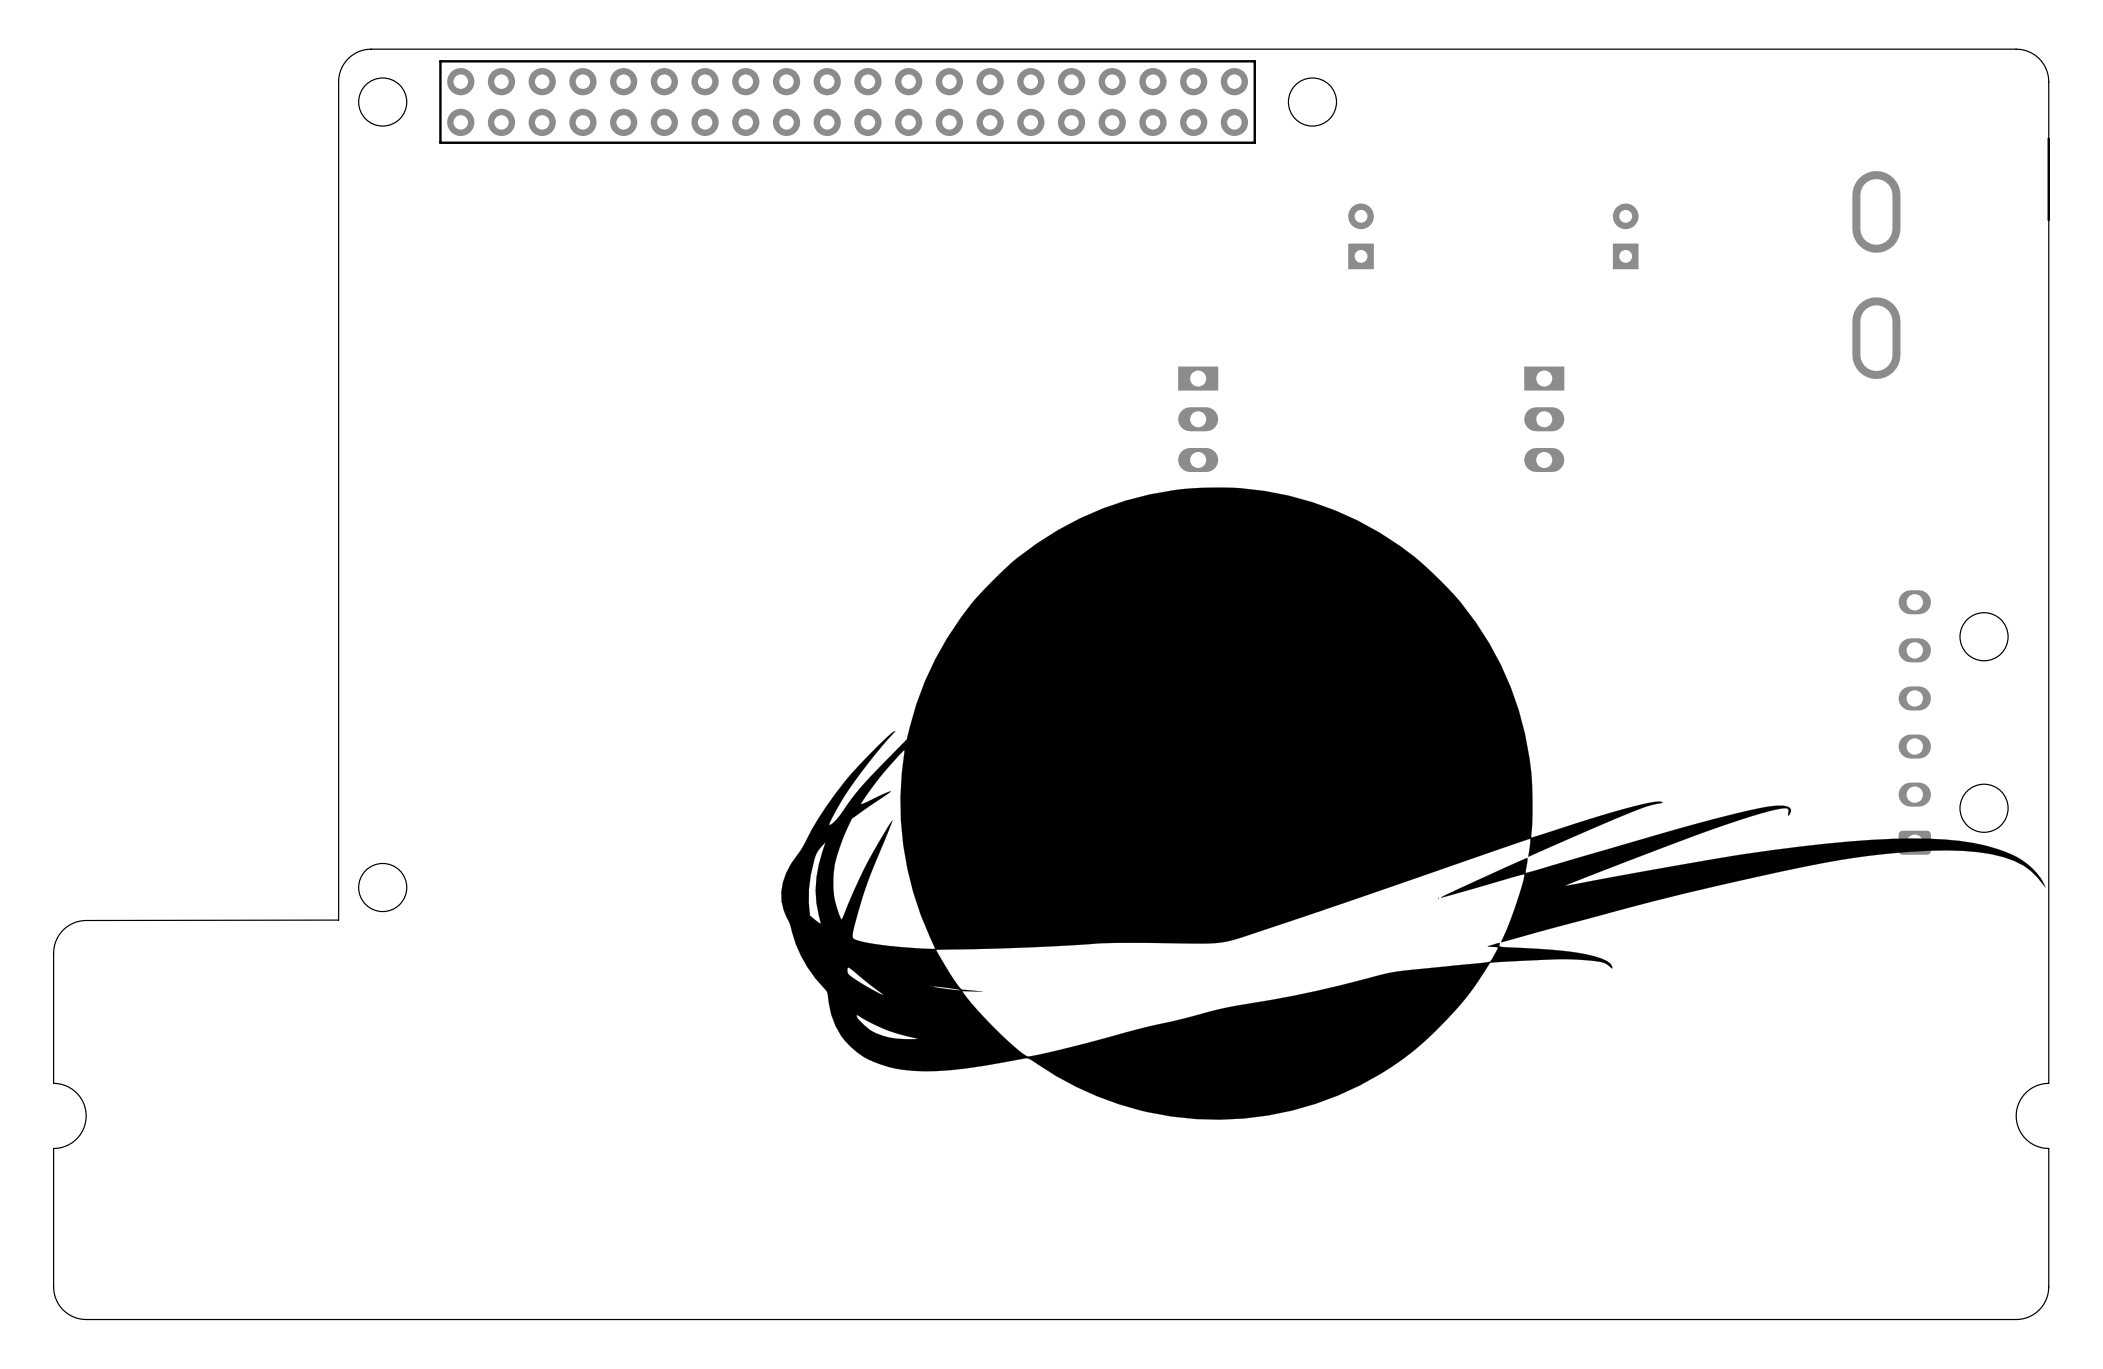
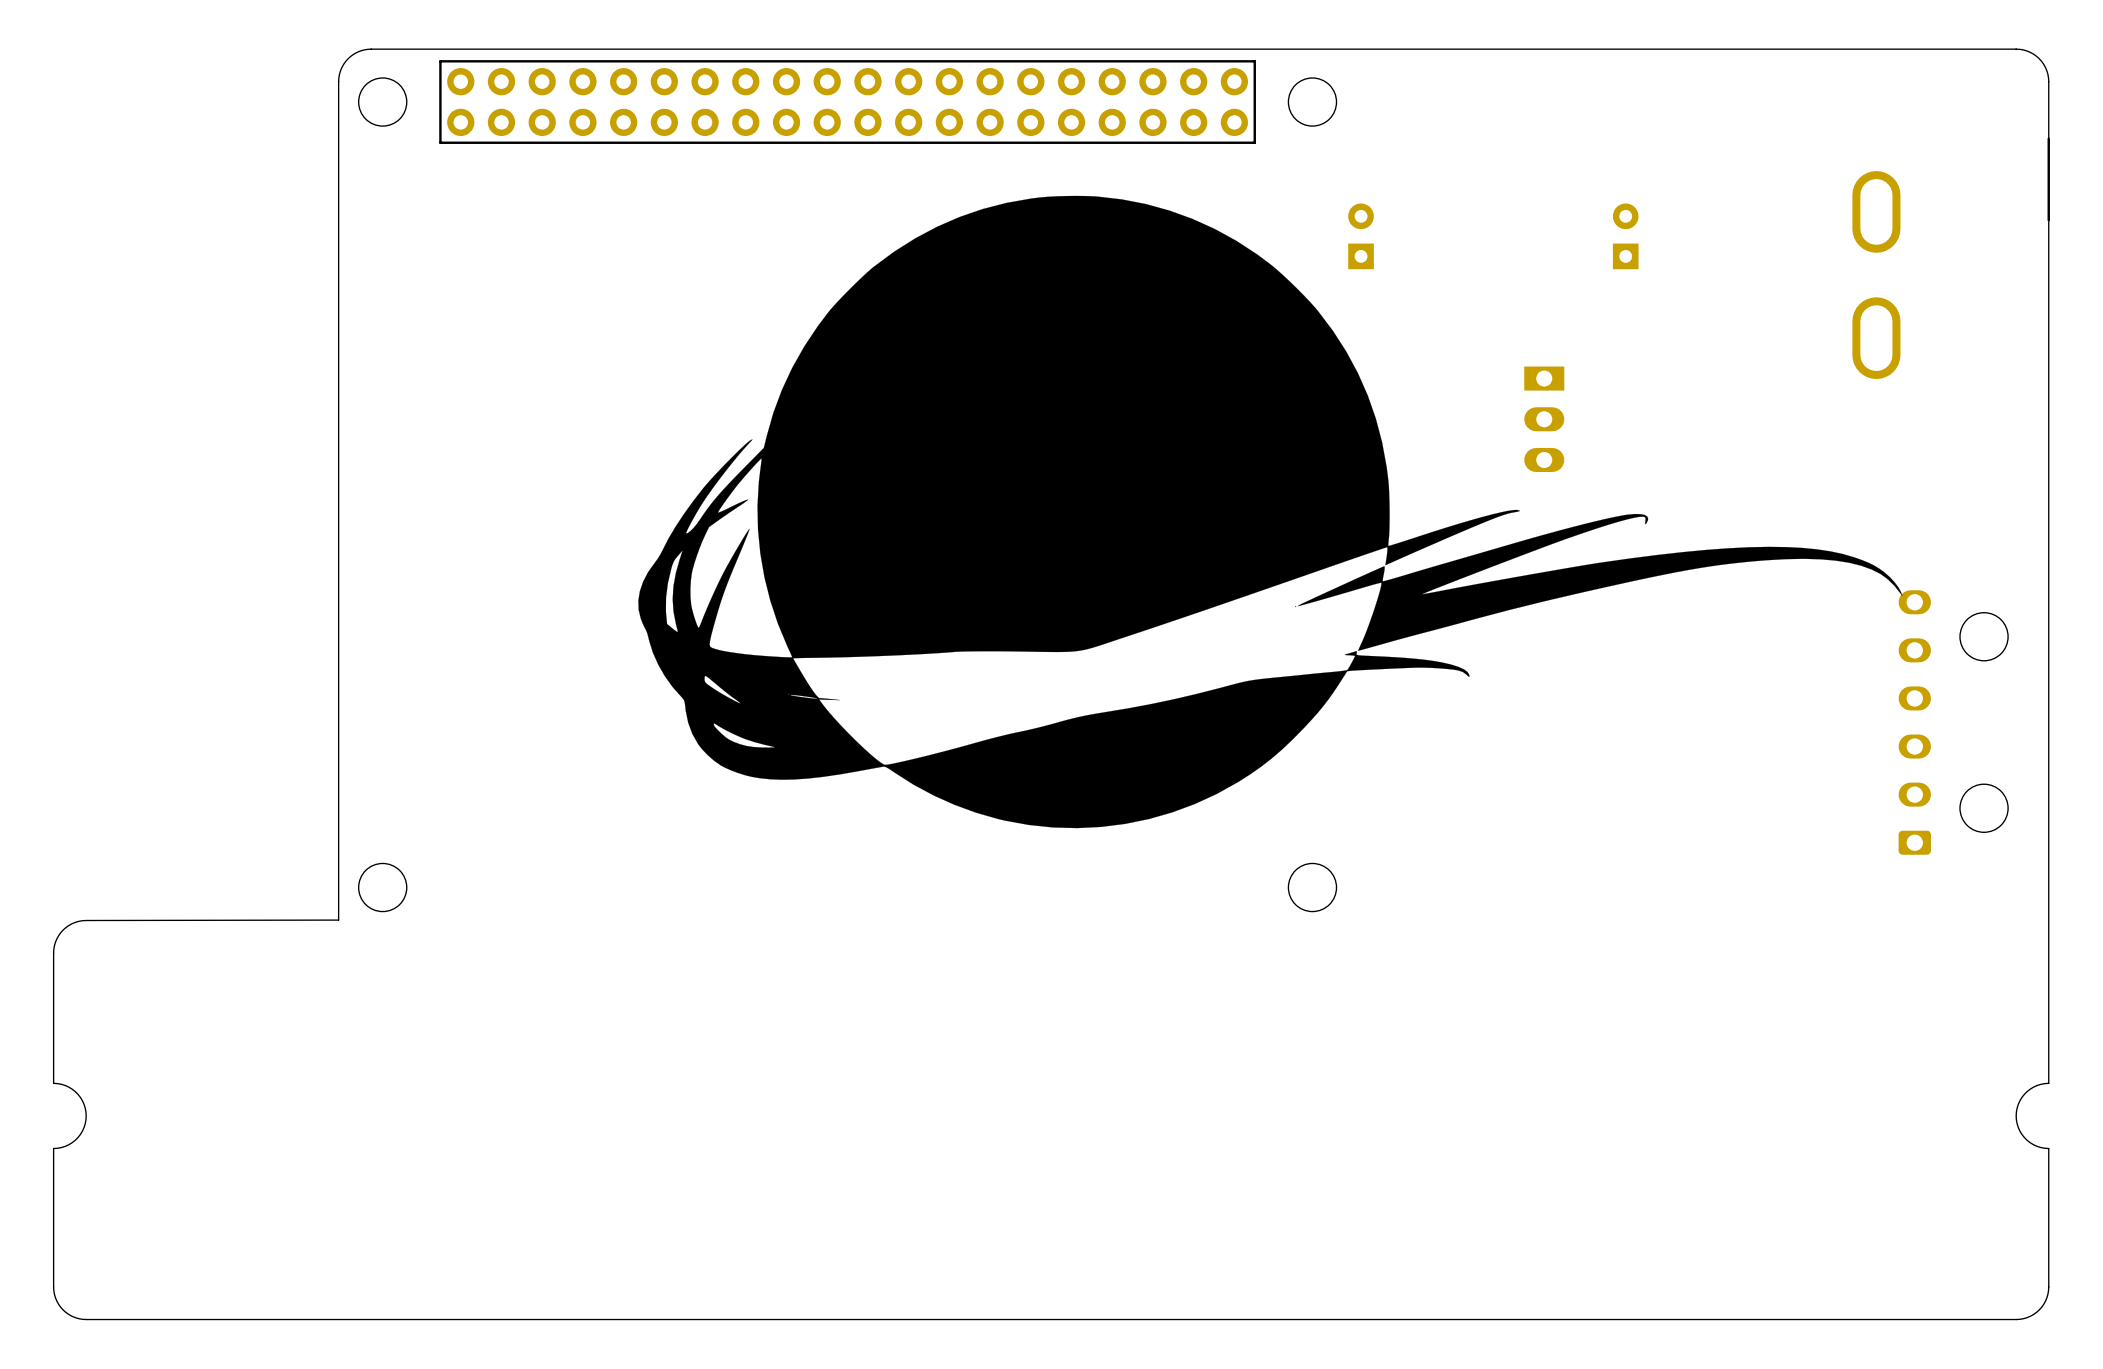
drawing position: (1413, 803) -> (1270, 512)

